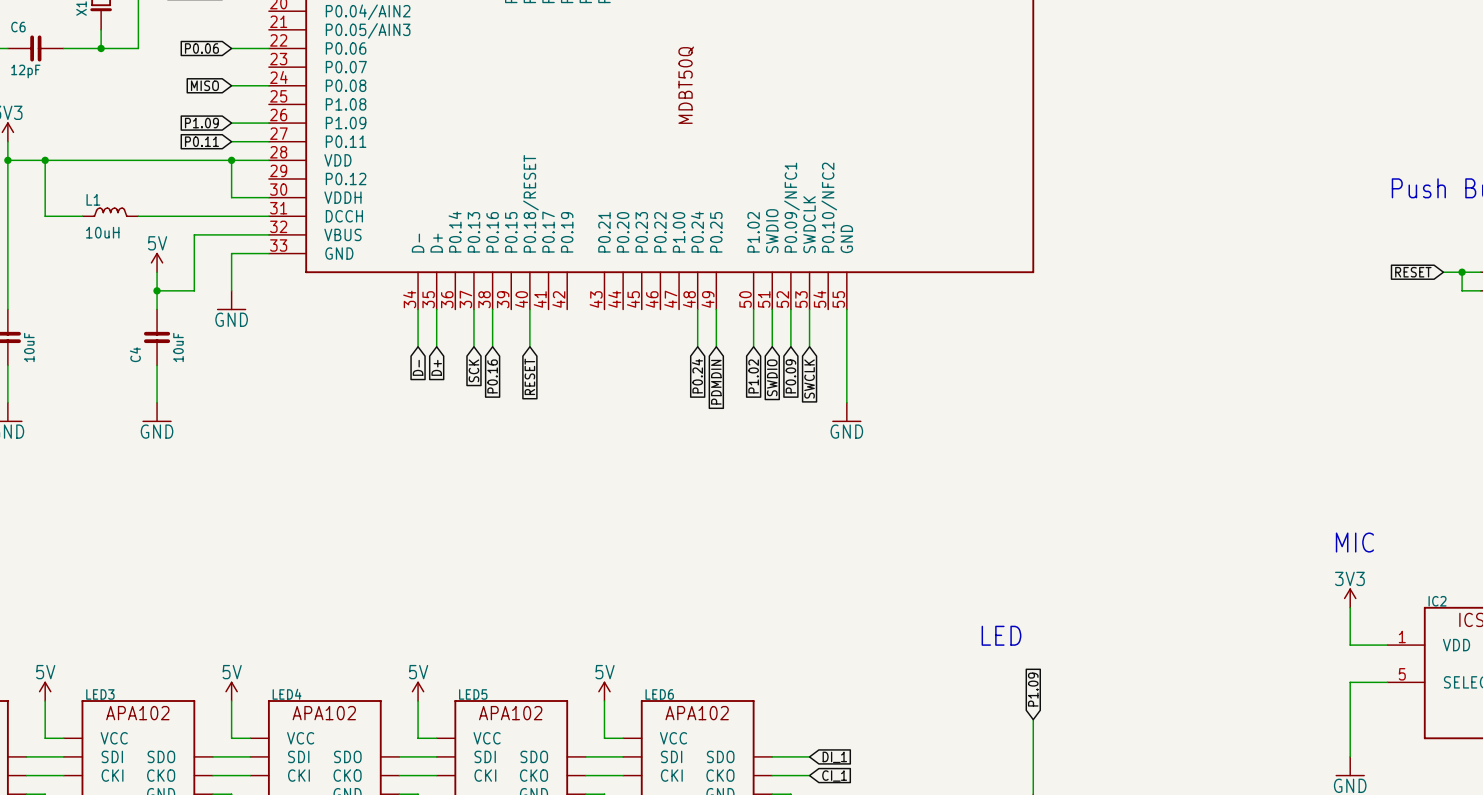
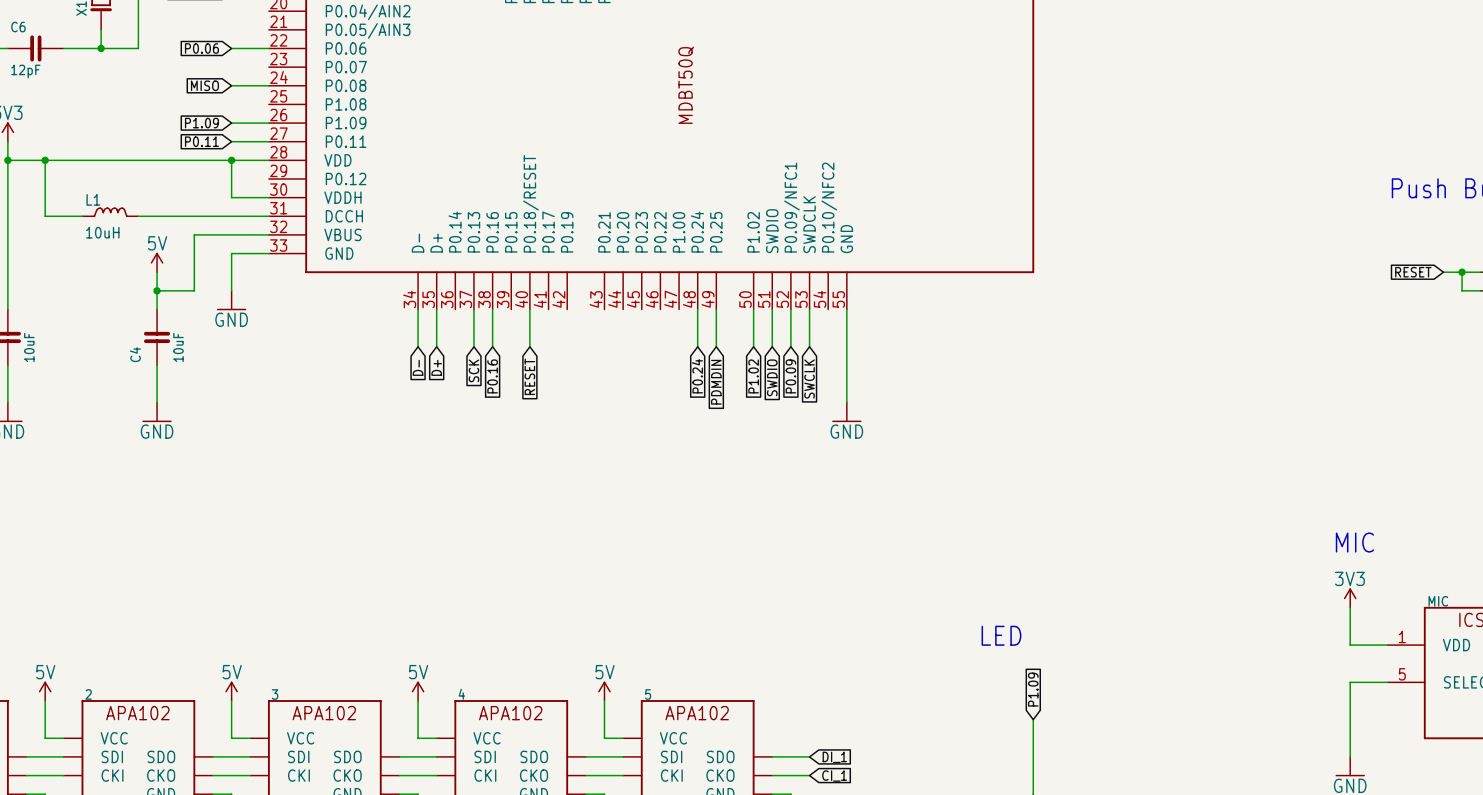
IC2 name: IC2 (1437, 601) -> MIC (1438, 601)
LED3 name: LED3 (100, 694) -> 2 (88, 694)
LED4 name: LED4 (287, 694) -> 3 (275, 694)
LED5 name: LED5 (473, 694) -> 4 (461, 694)
LED6 name: LED6 (659, 694) -> 5 (648, 694)

